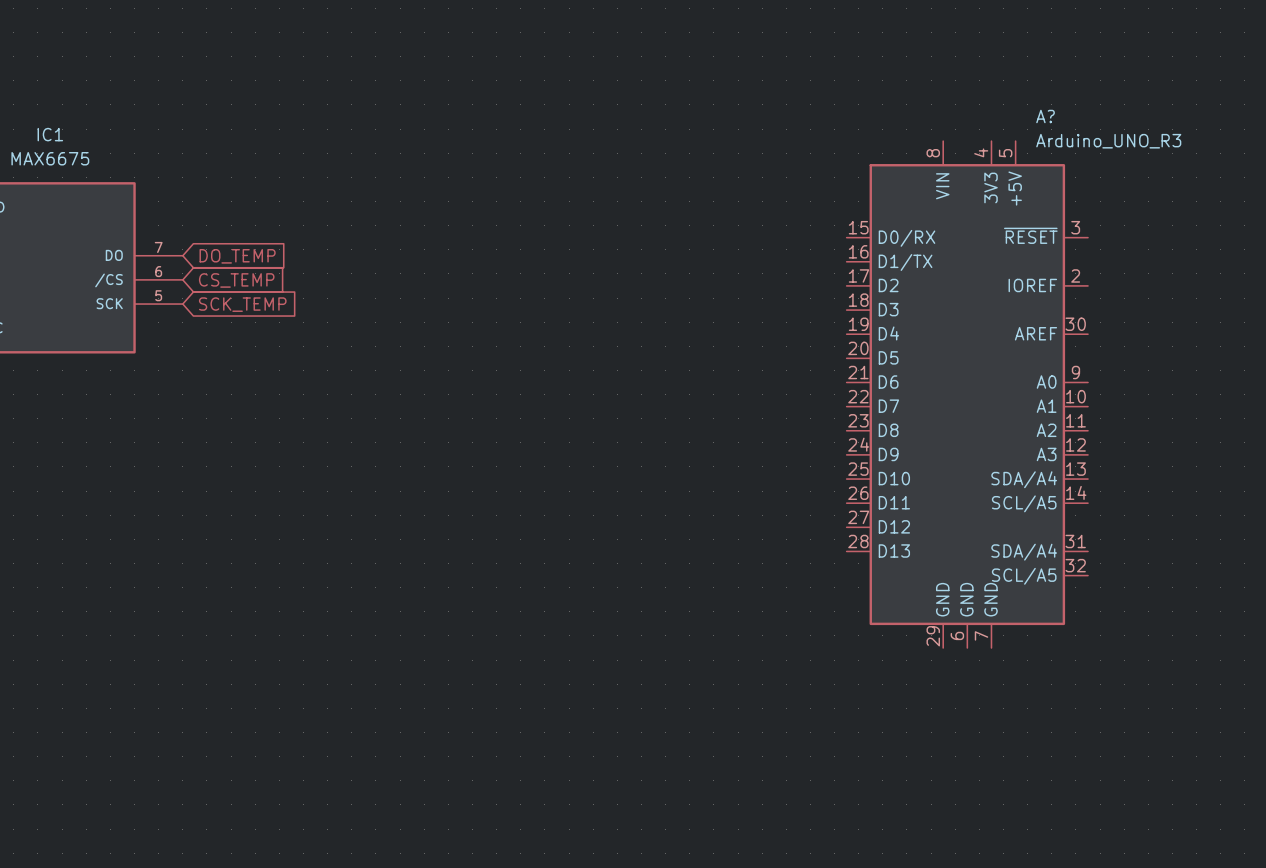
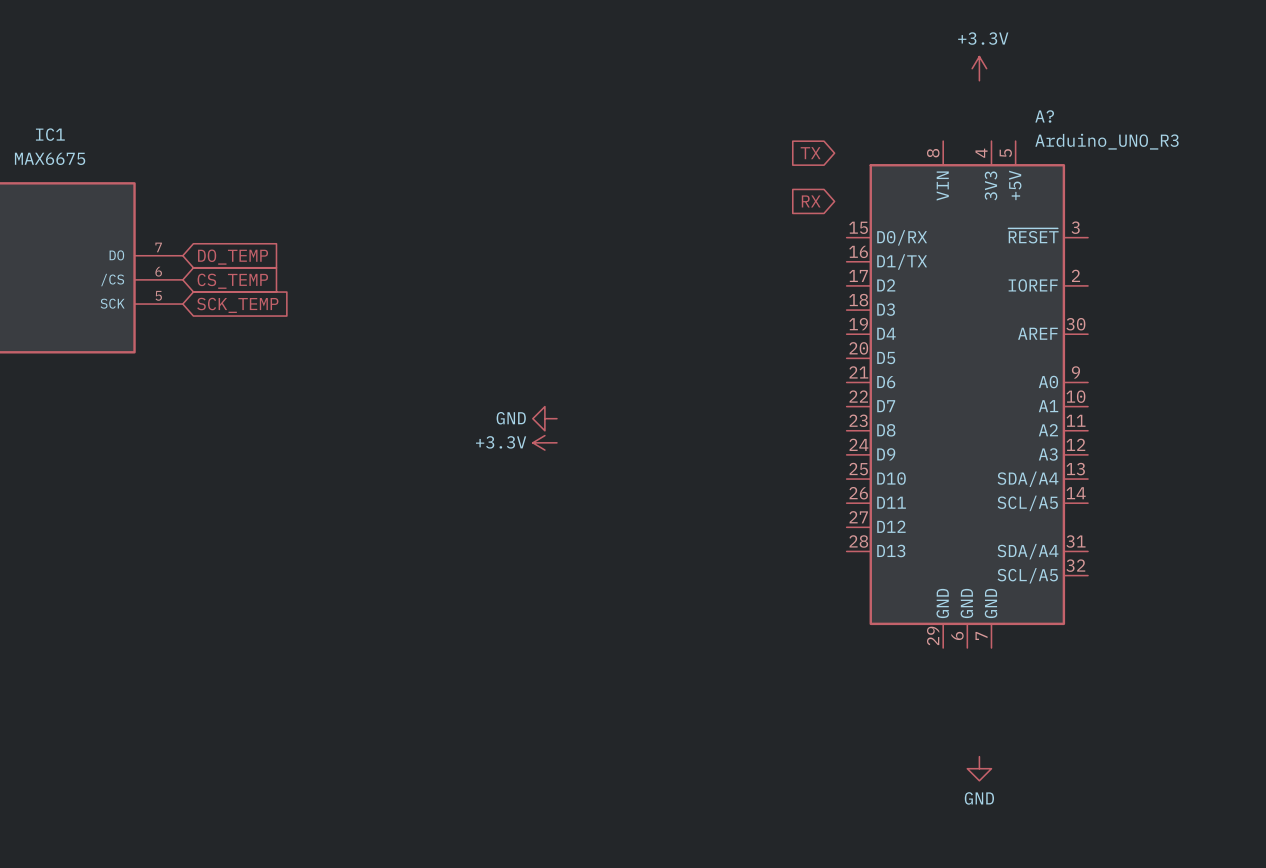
power symbol: none -> +3.3V (979, 68)
global label: none -> TX (810, 153)
global label: none -> RX (811, 201)
power symbol: none -> GND (544, 418)
power symbol: none -> +3.3V (544, 442)
power symbol: none -> GND (979, 768)

